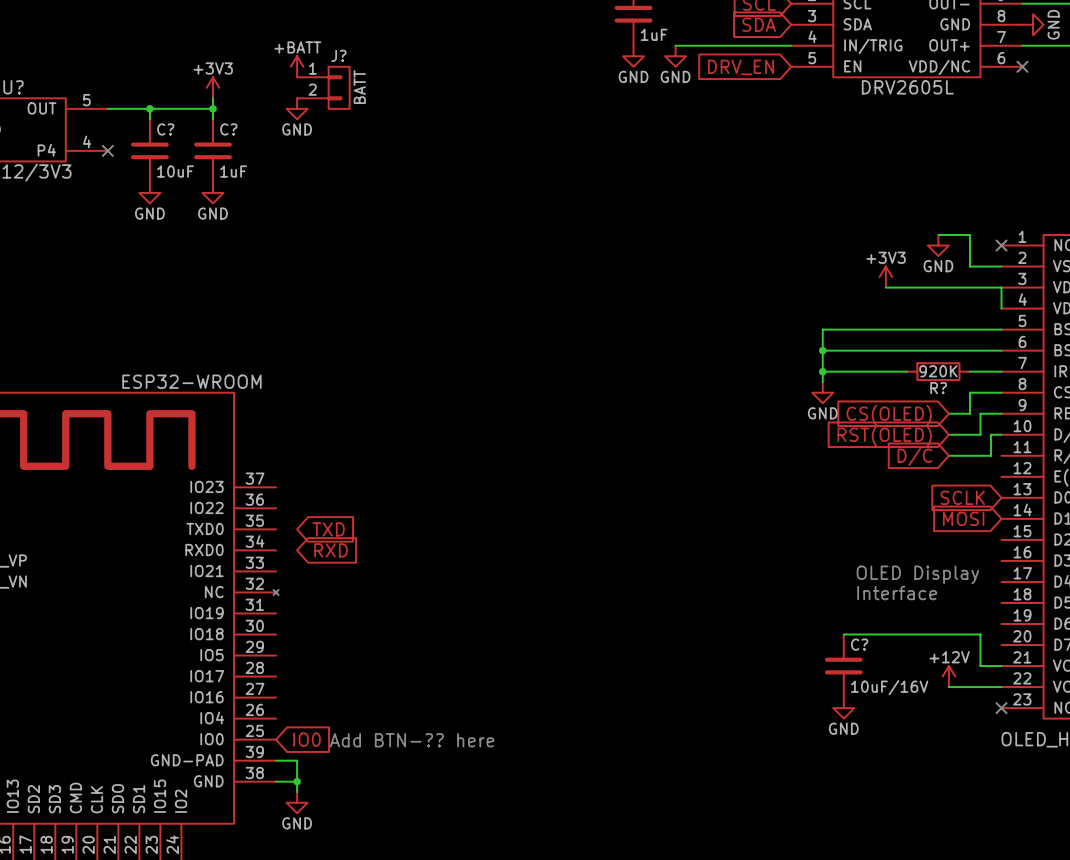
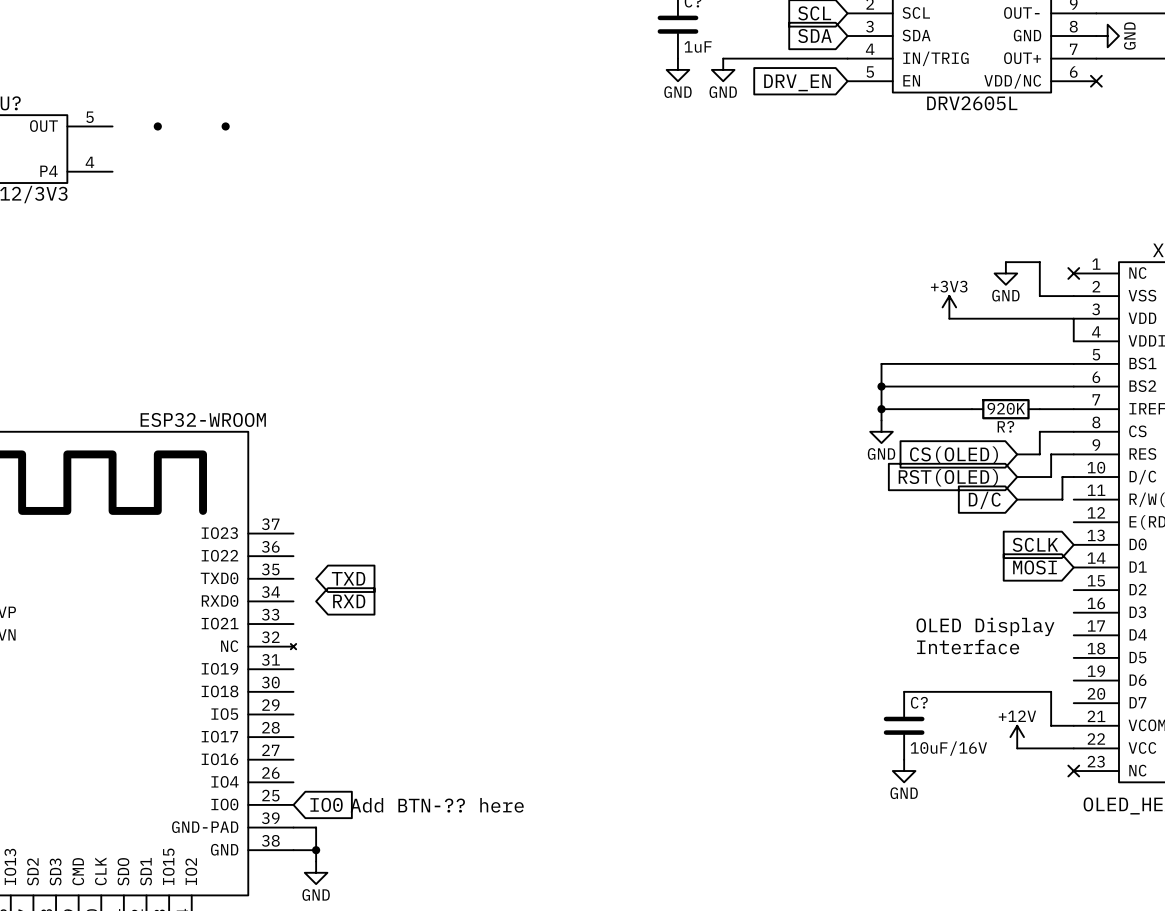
power symbol: +BATT (297, 66) -> none
power symbol: +3V3 (212, 87) -> none
J?: BATT (323, 87) -> none
wire: (212, 98) (212, 119) -> none
wire: (107, 108) (212, 108) -> none
wire: (149, 108) (149, 119) -> none
power symbol: GND (297, 108) -> none
no-connect mark: (107, 150) -> none
C?: 10uF (149, 150) -> none
C?: 1uF (212, 150) -> none
power symbol: GND (149, 192) -> none
power symbol: GND (212, 192) -> none

